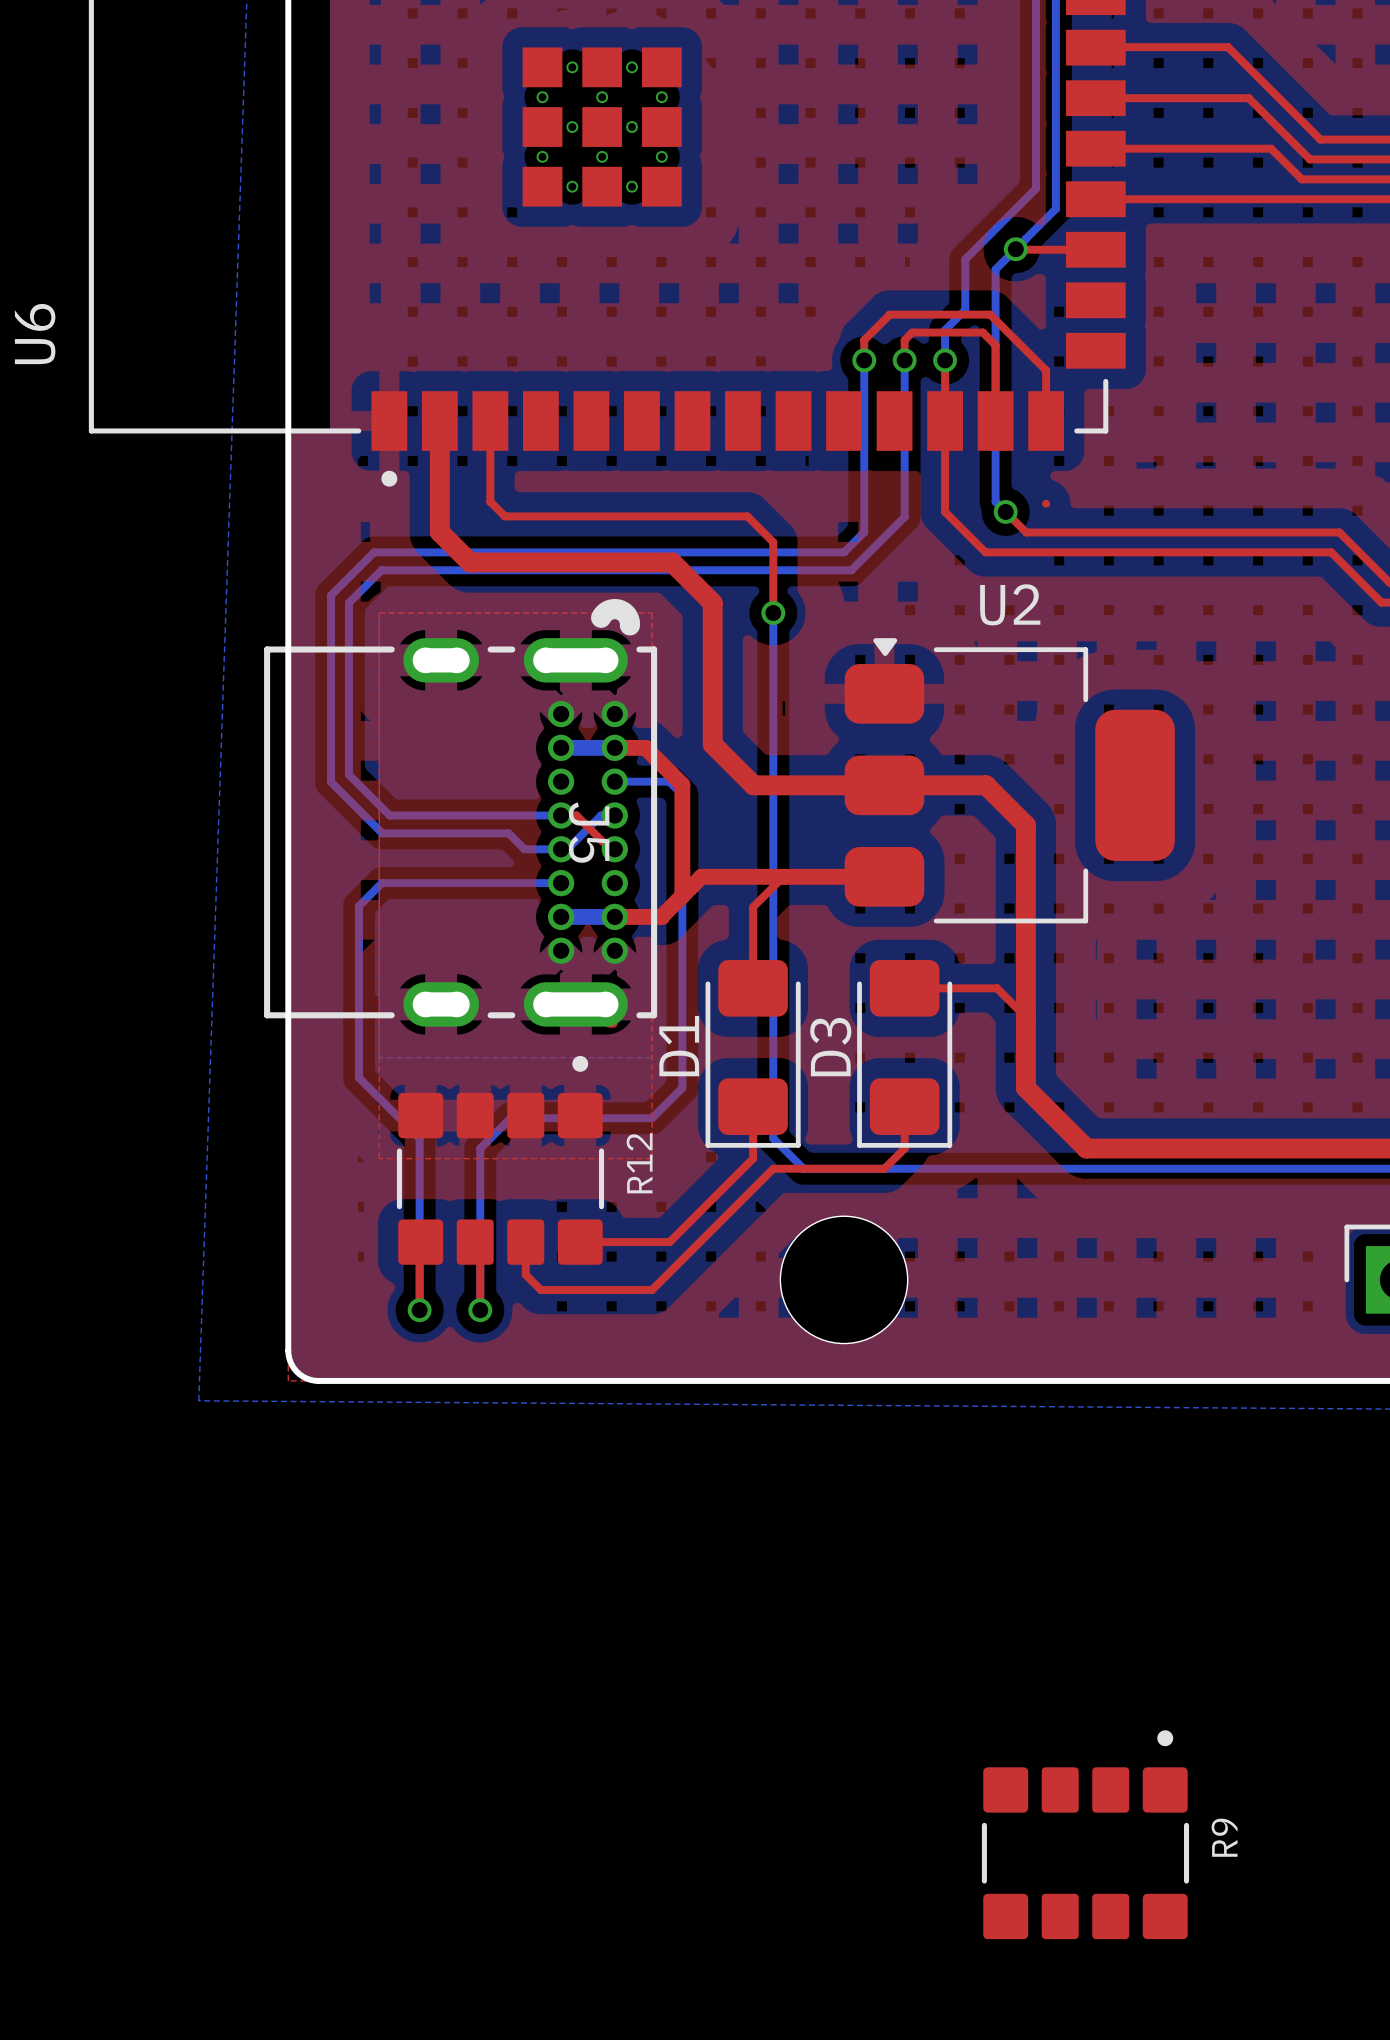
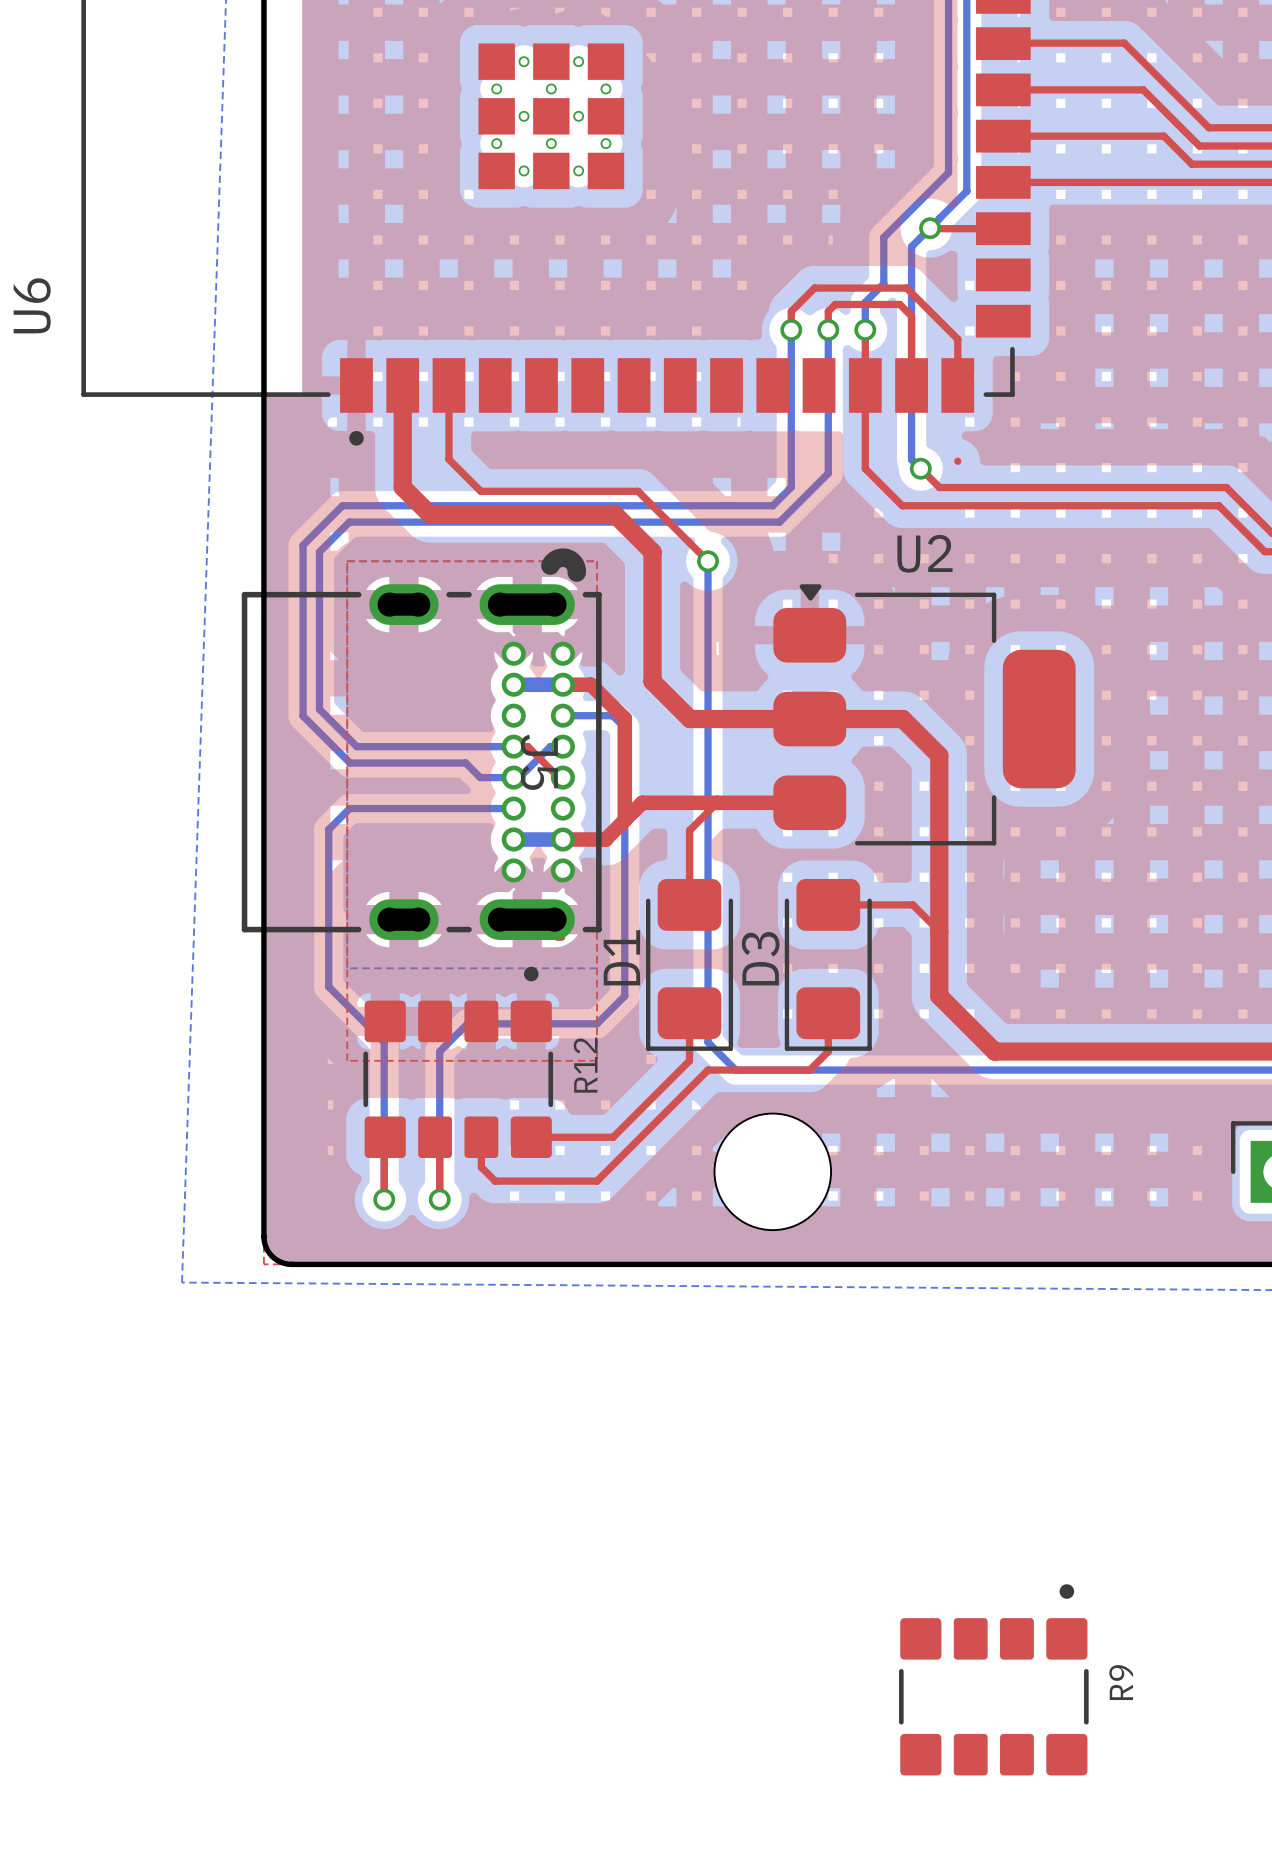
top track: (504, 516) (747, 516) (773, 542) (773, 613) -> (462, 472) (480, 491) (638, 491) (708, 561)

